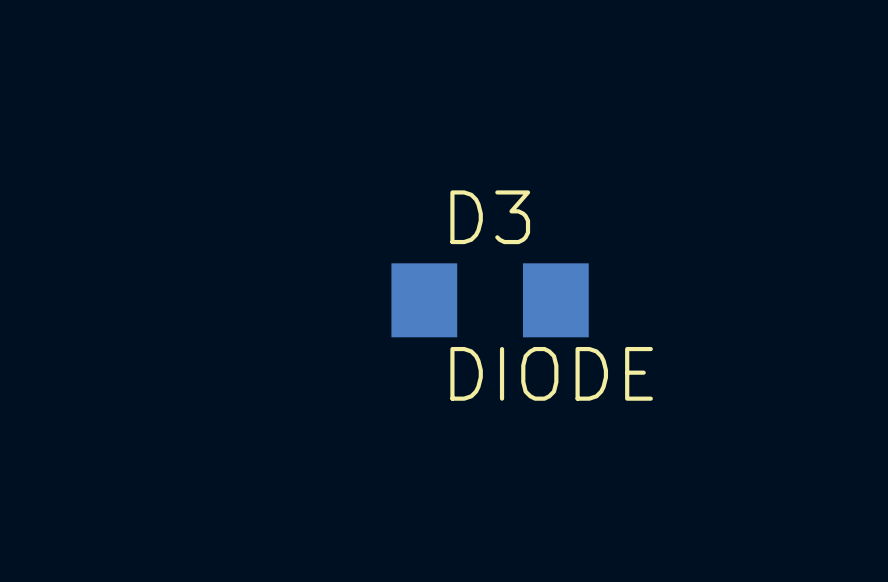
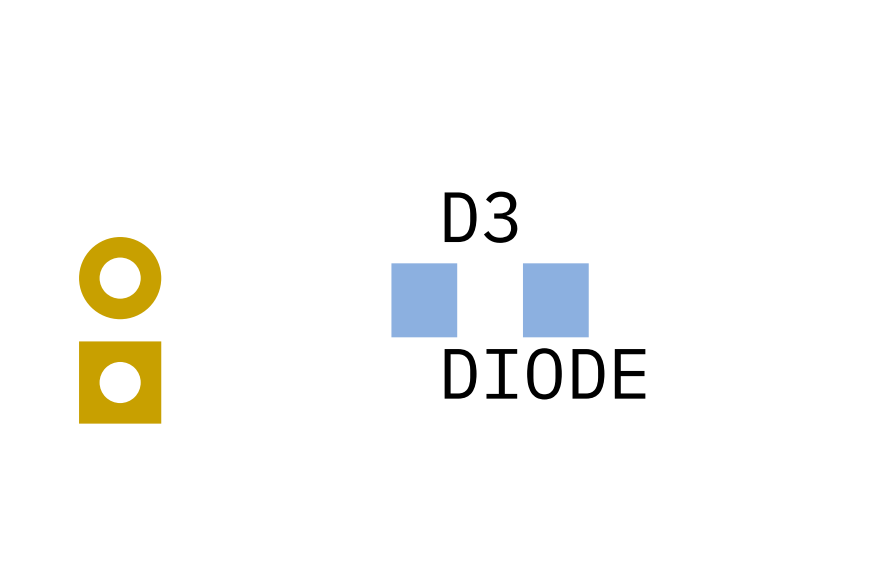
part: none -> (120, 330)

